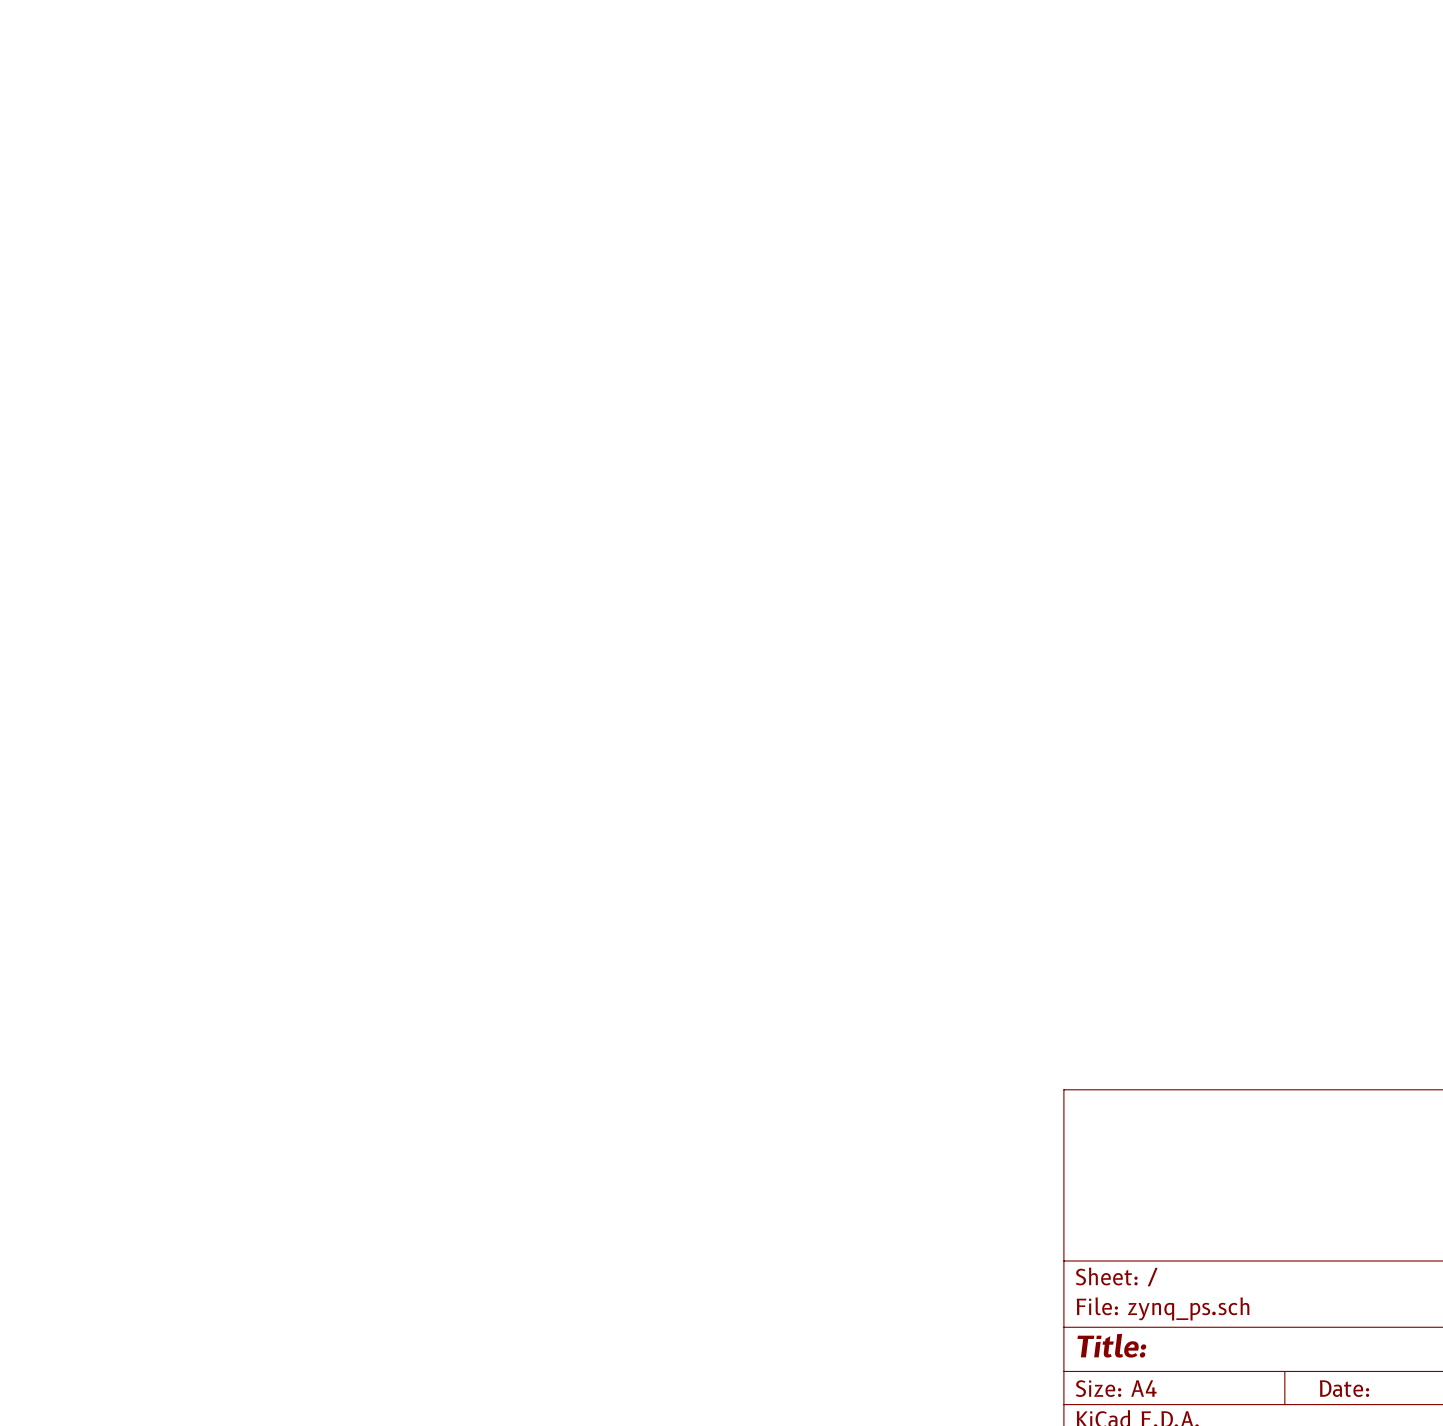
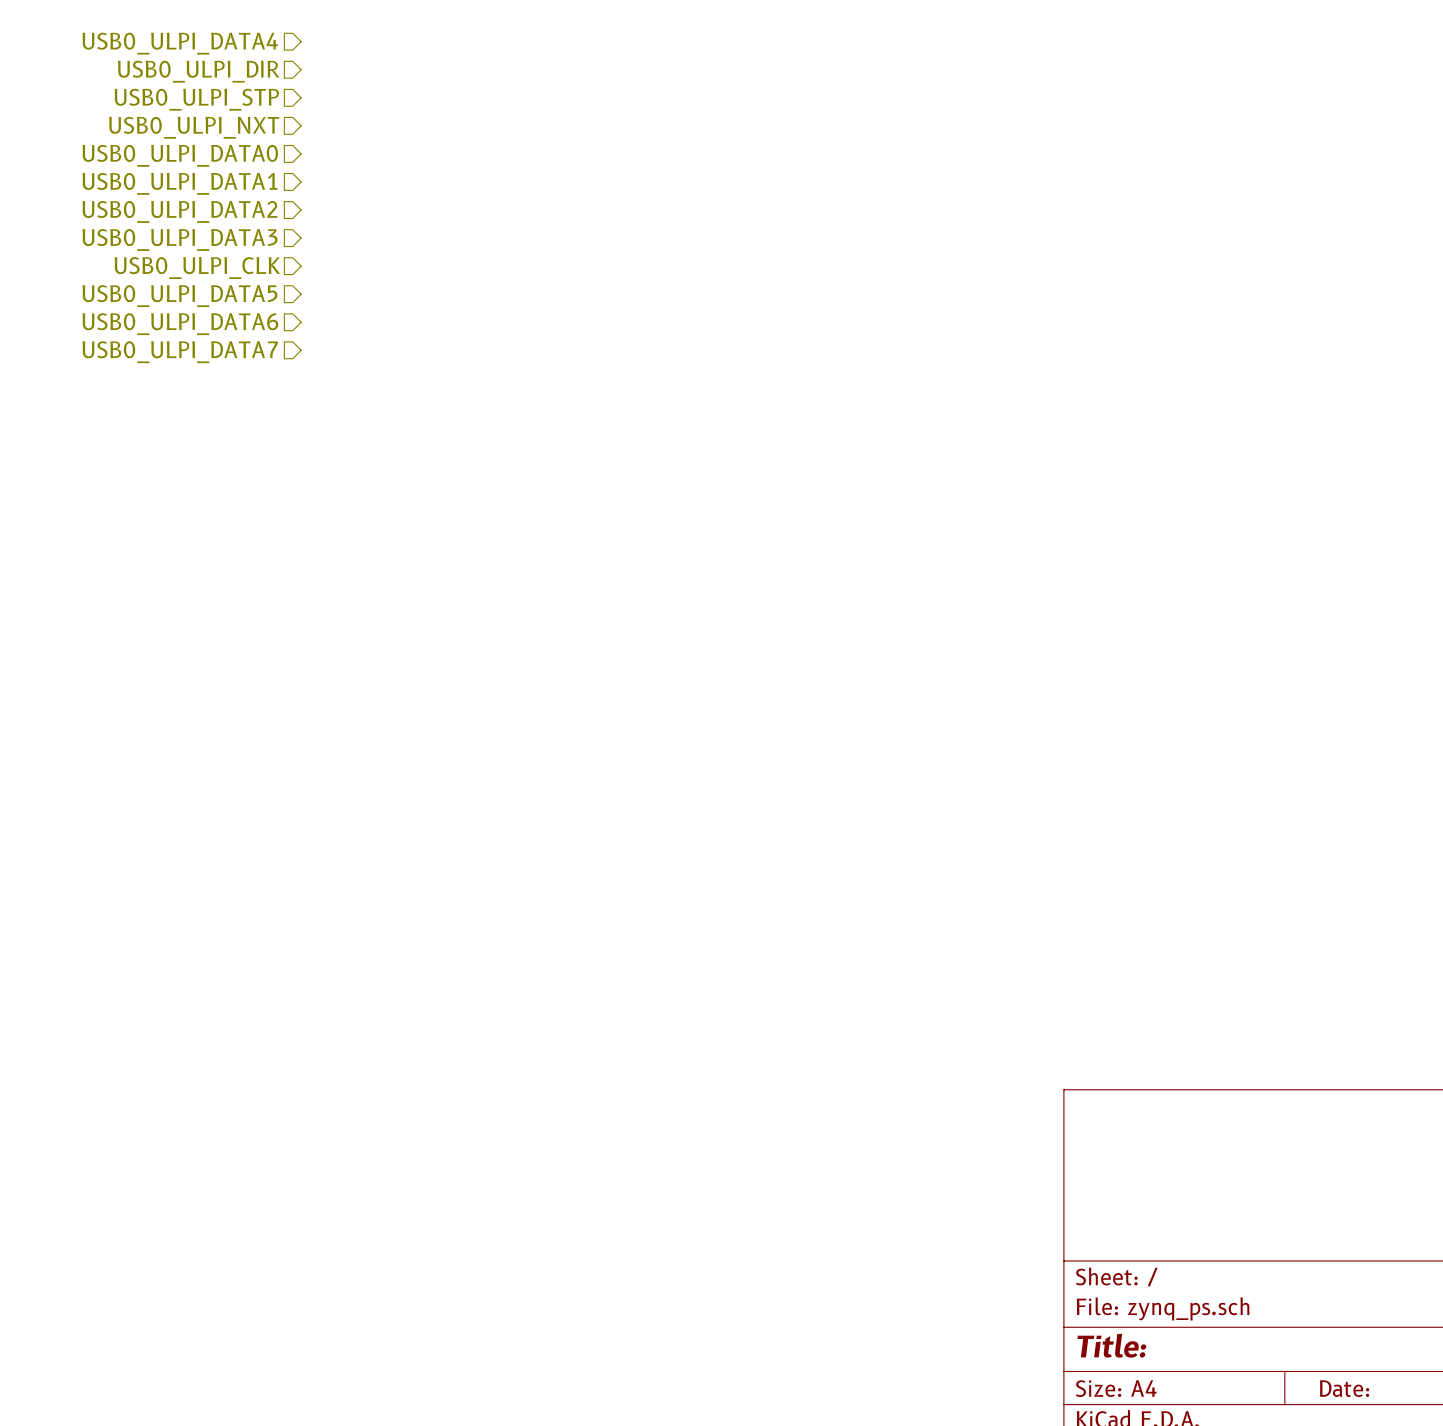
hierarchical label: none -> USB0_ULPI_DATA4 (180, 43)
hierarchical label: none -> USB0_ULPI_DIR (198, 71)
hierarchical label: none -> USB0_ULPI_STP (196, 99)
hierarchical label: none -> USB0_ULPI_NXT (194, 127)
hierarchical label: none -> USB0_ULPI_DATA0 (180, 155)
hierarchical label: none -> USB0_ULPI_DATA1 (179, 183)
hierarchical label: none -> USB0_ULPI_DATA2 (179, 211)
hierarchical label: none -> USB0_ULPI_DATA3 (179, 239)
hierarchical label: none -> USB0_ULPI_CLK (197, 268)
hierarchical label: none -> USB0_ULPI_DATA5 (179, 296)
hierarchical label: none -> USB0_ULPI_DATA6 (180, 324)
hierarchical label: none -> USB0_ULPI_DATA7 (180, 352)

